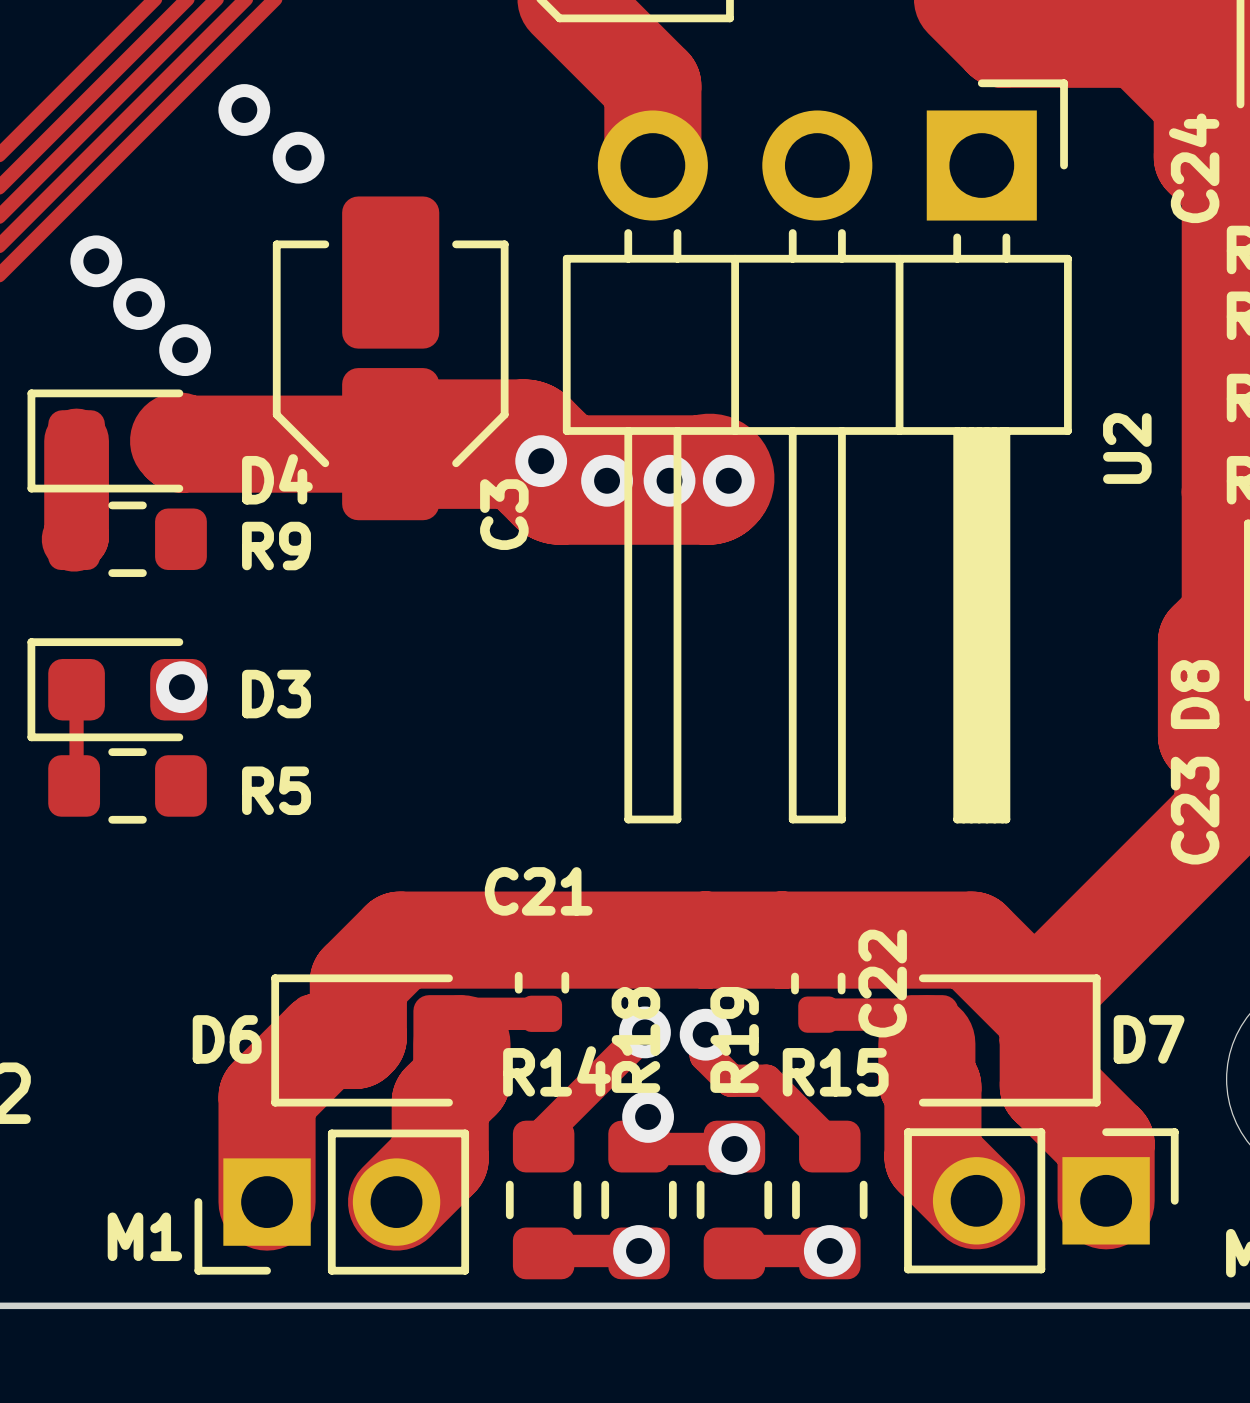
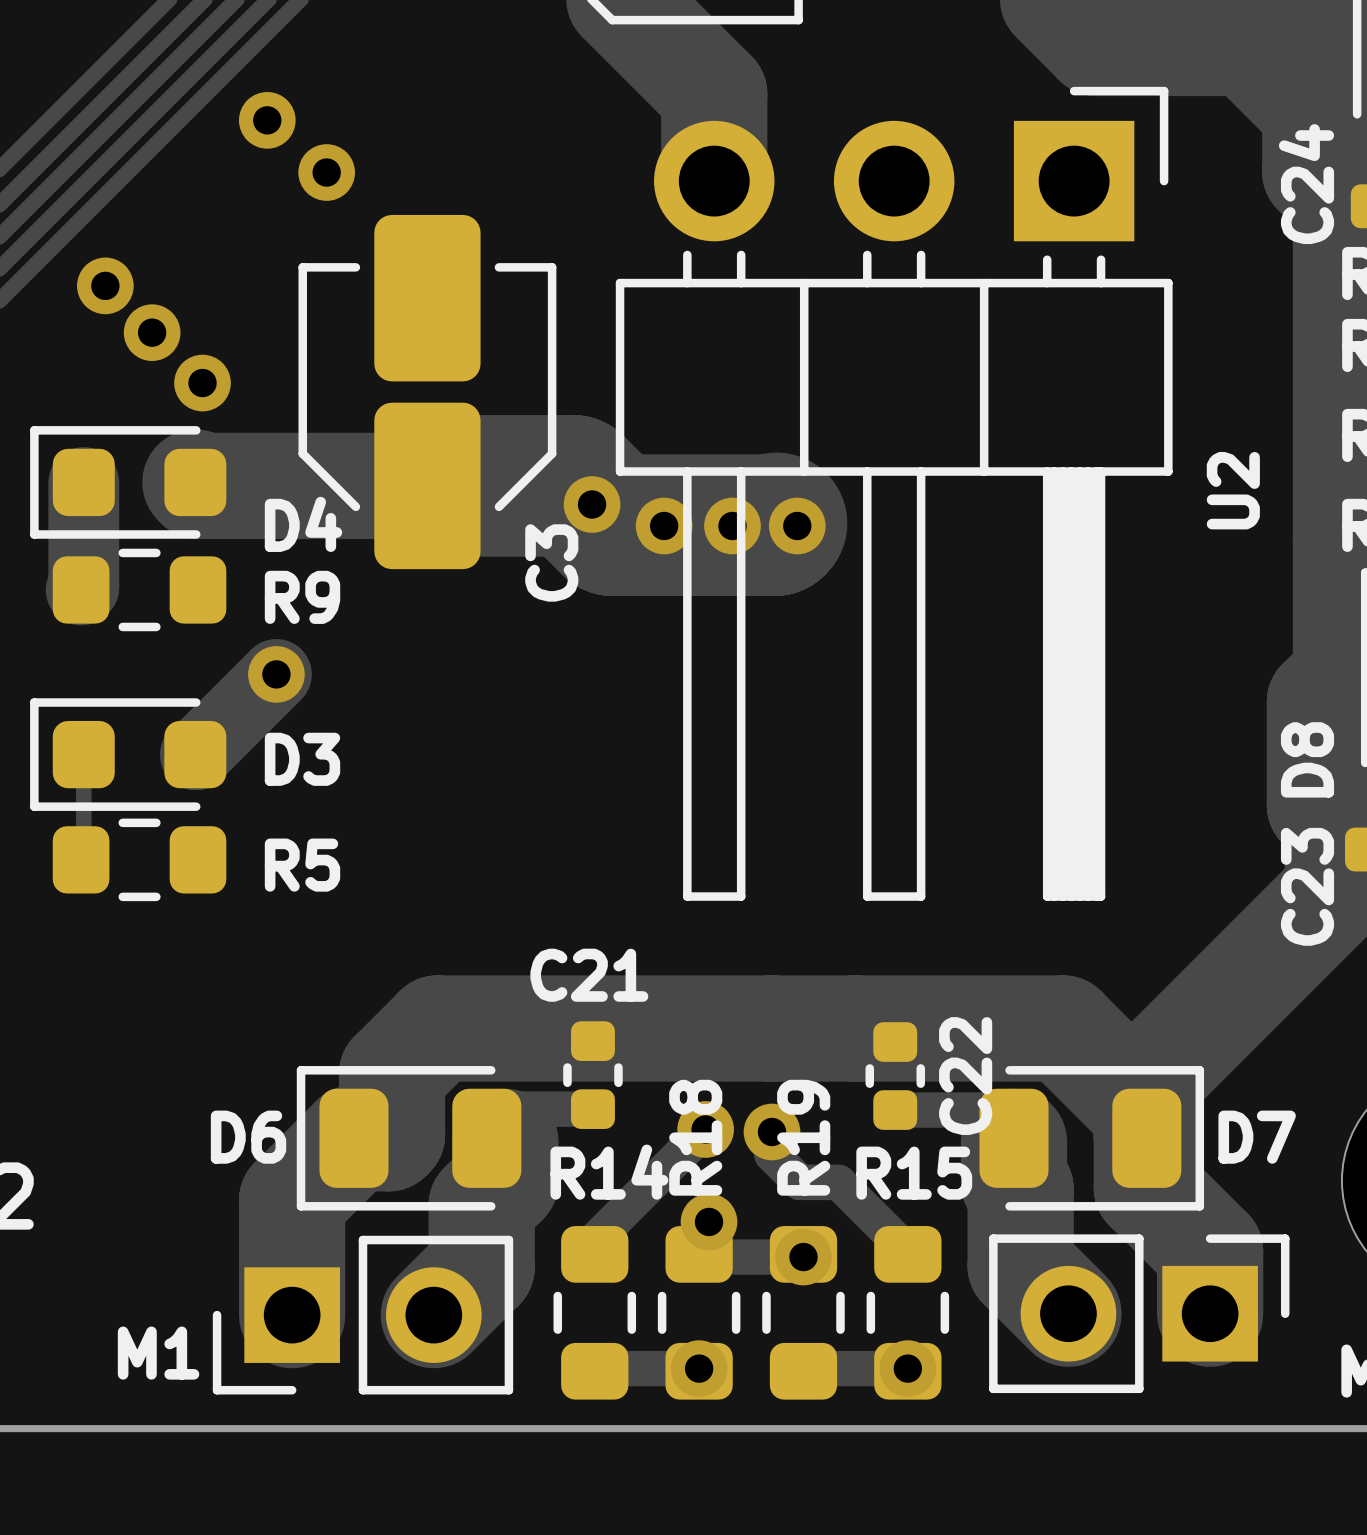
track: none -> (276, 674) (196, 754)
via position: (181, 687) -> (276, 674)

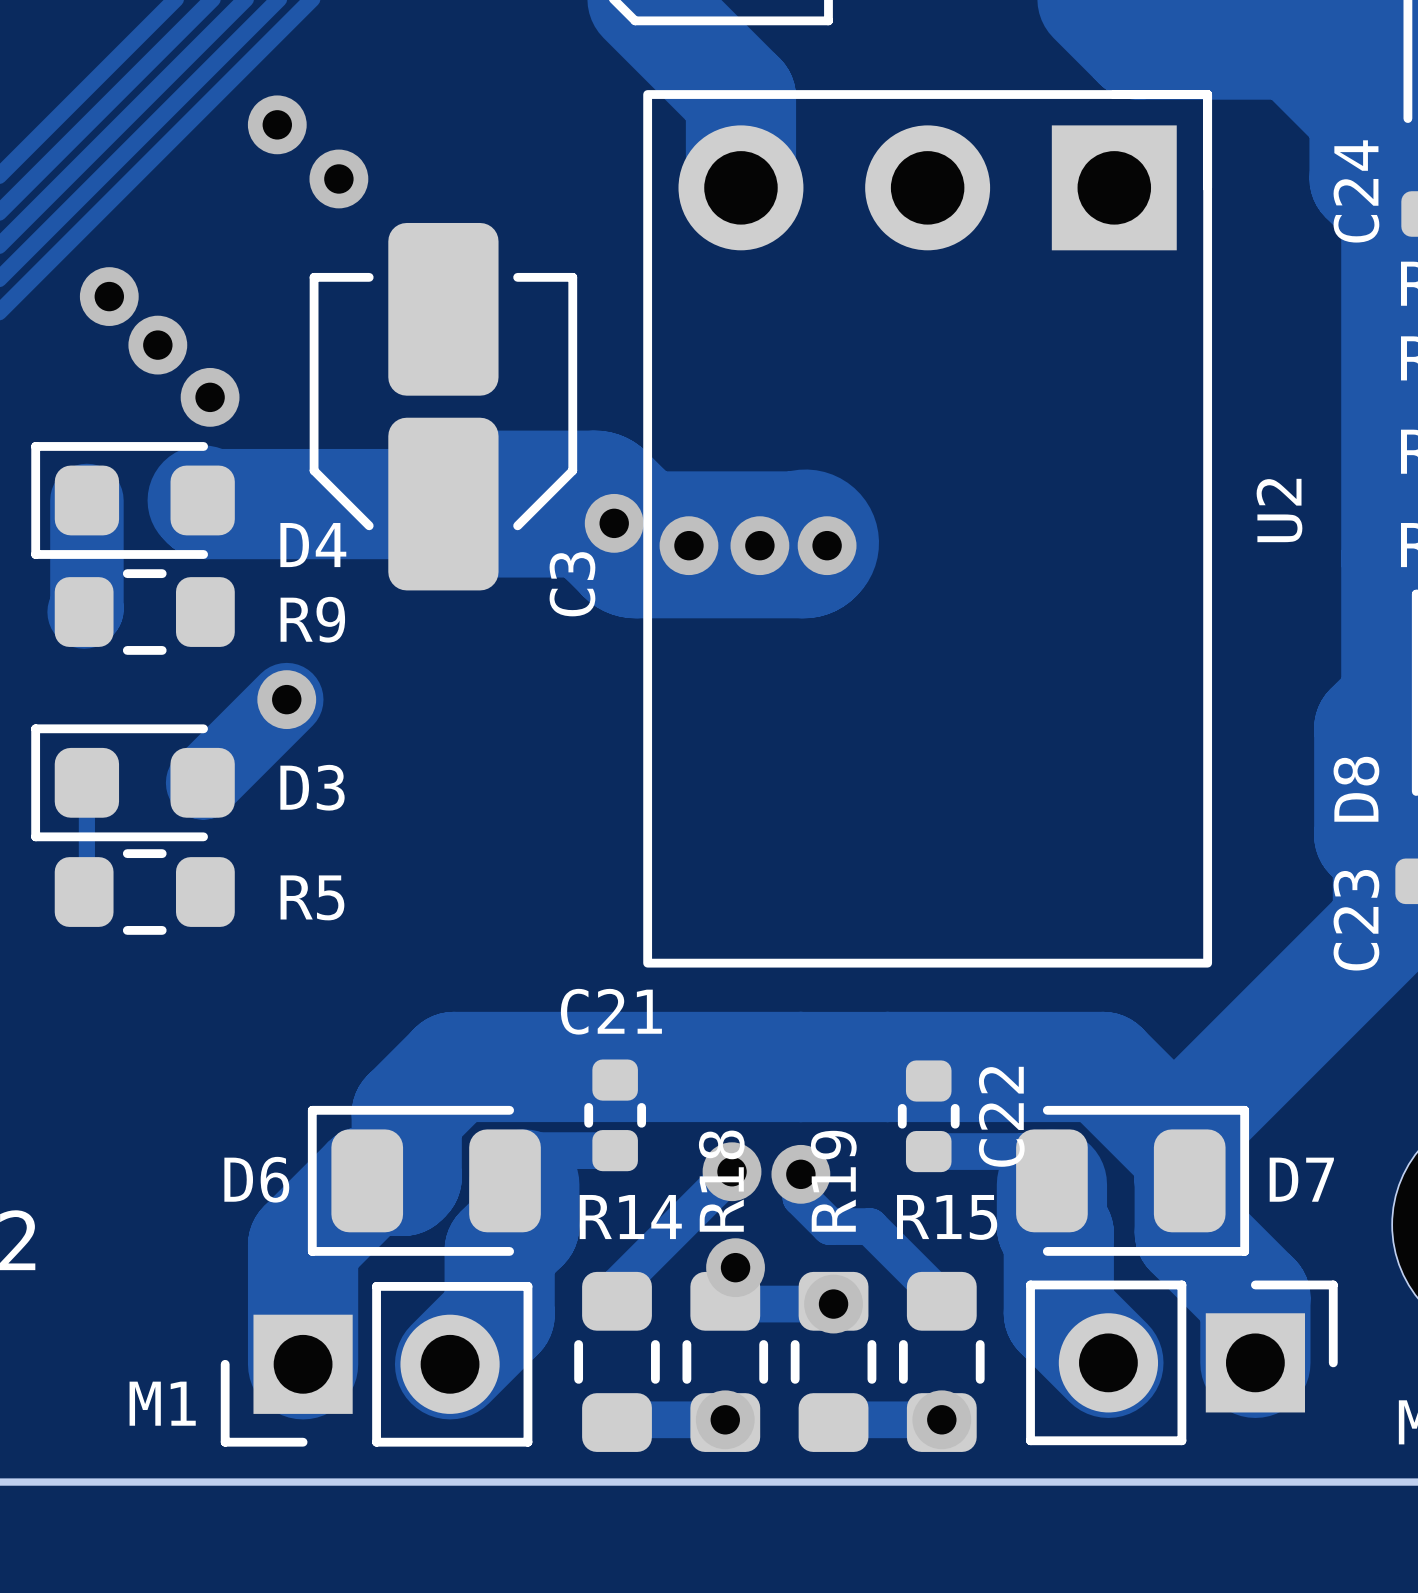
U2 footprint: [615, 86, 1173, 901] -> [643, 90, 1213, 968]

